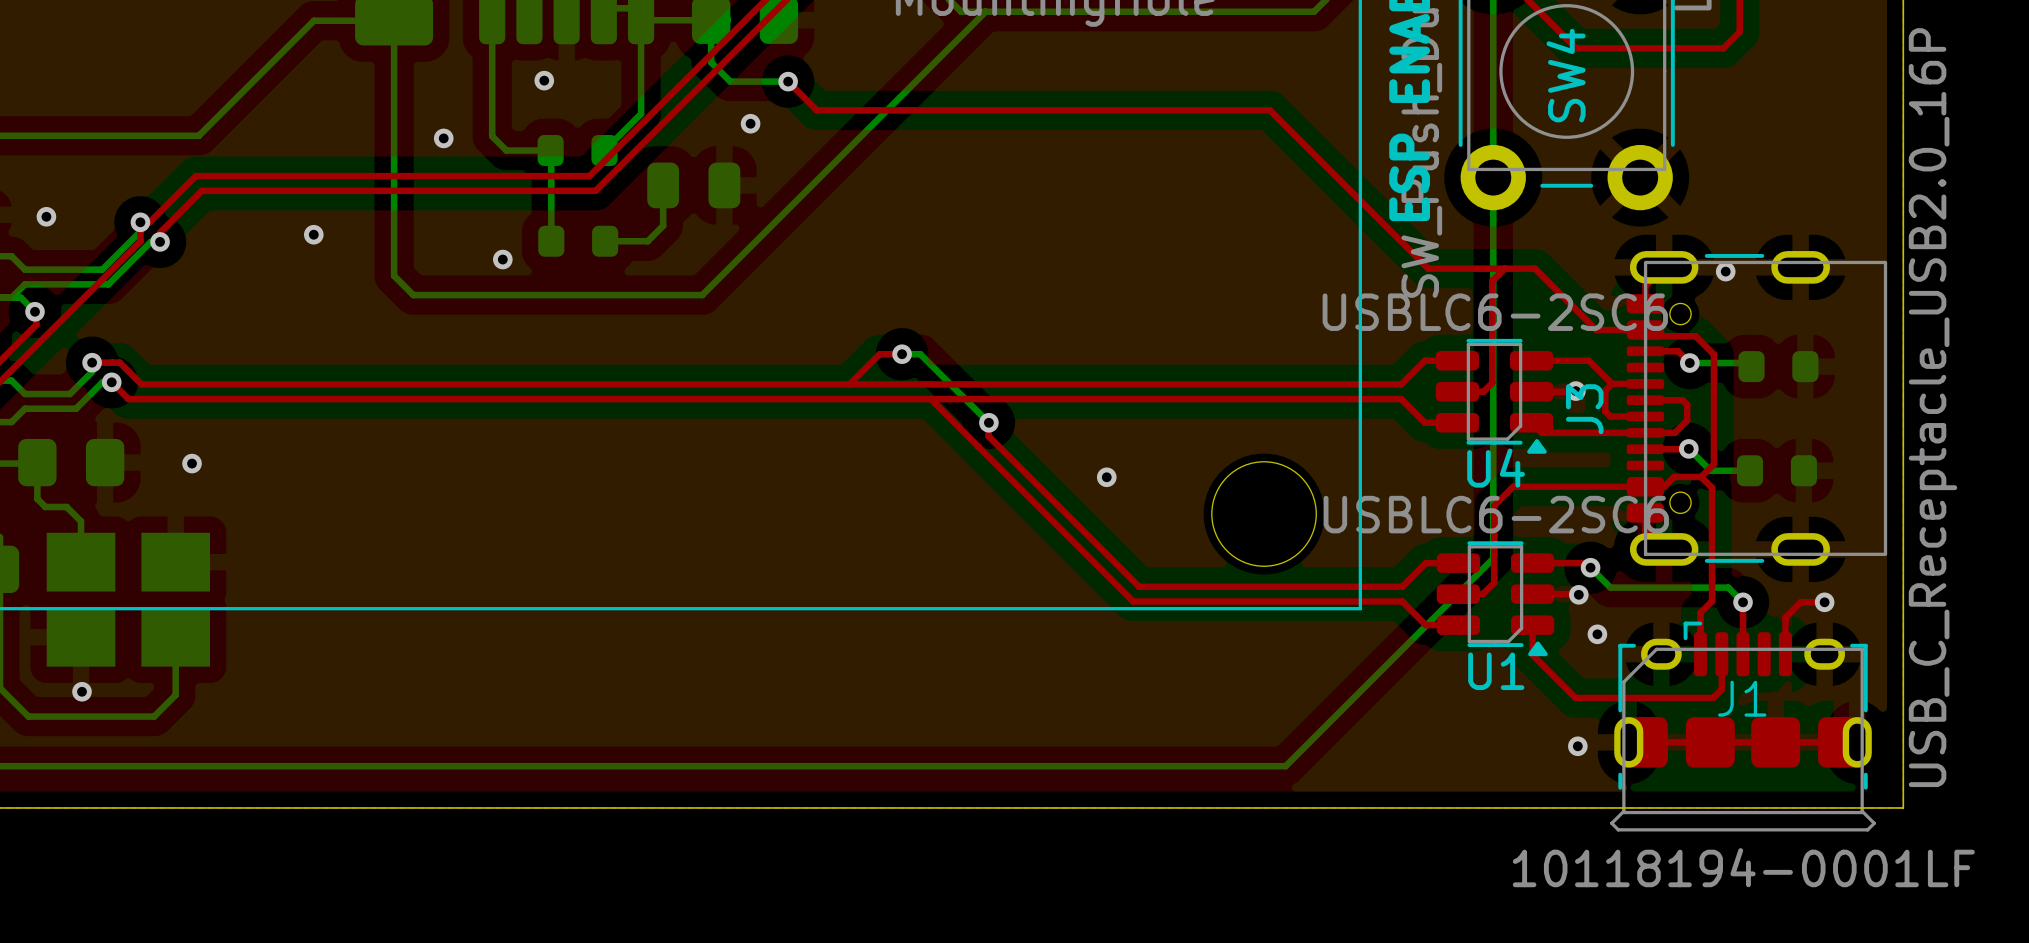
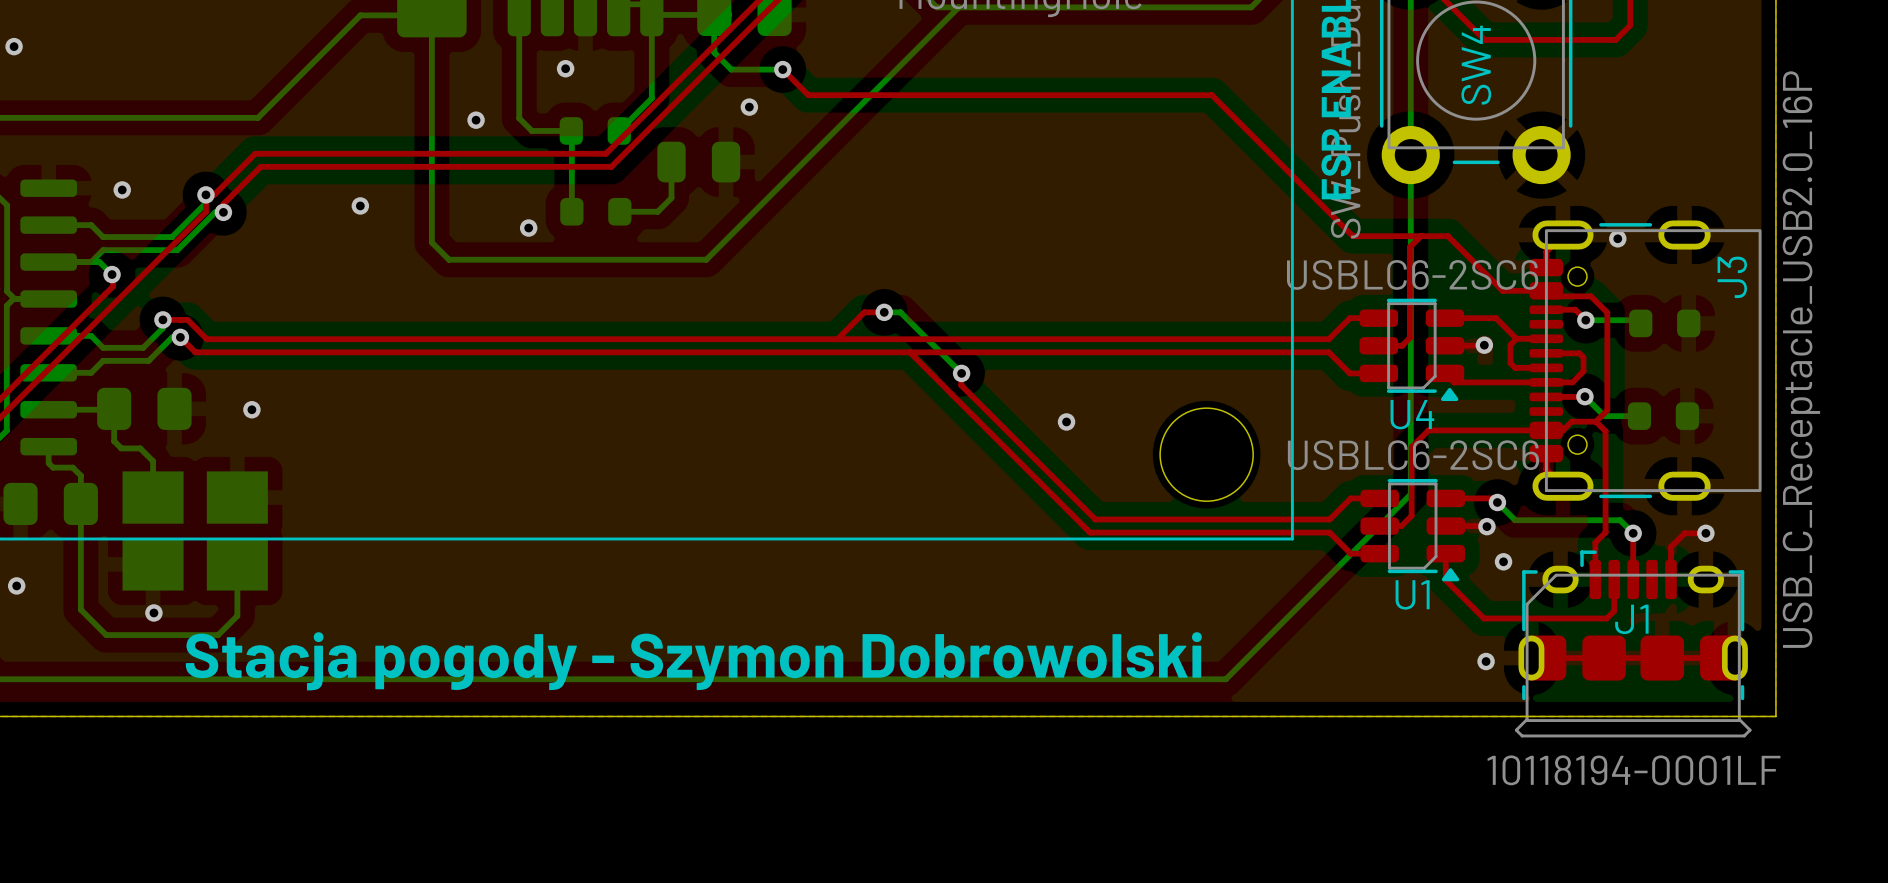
J3 name position: J3 (1584, 409) -> J3 (1732, 277)
text: none -> Stacja pogody - Szymon Dobrowolski (693, 661)

